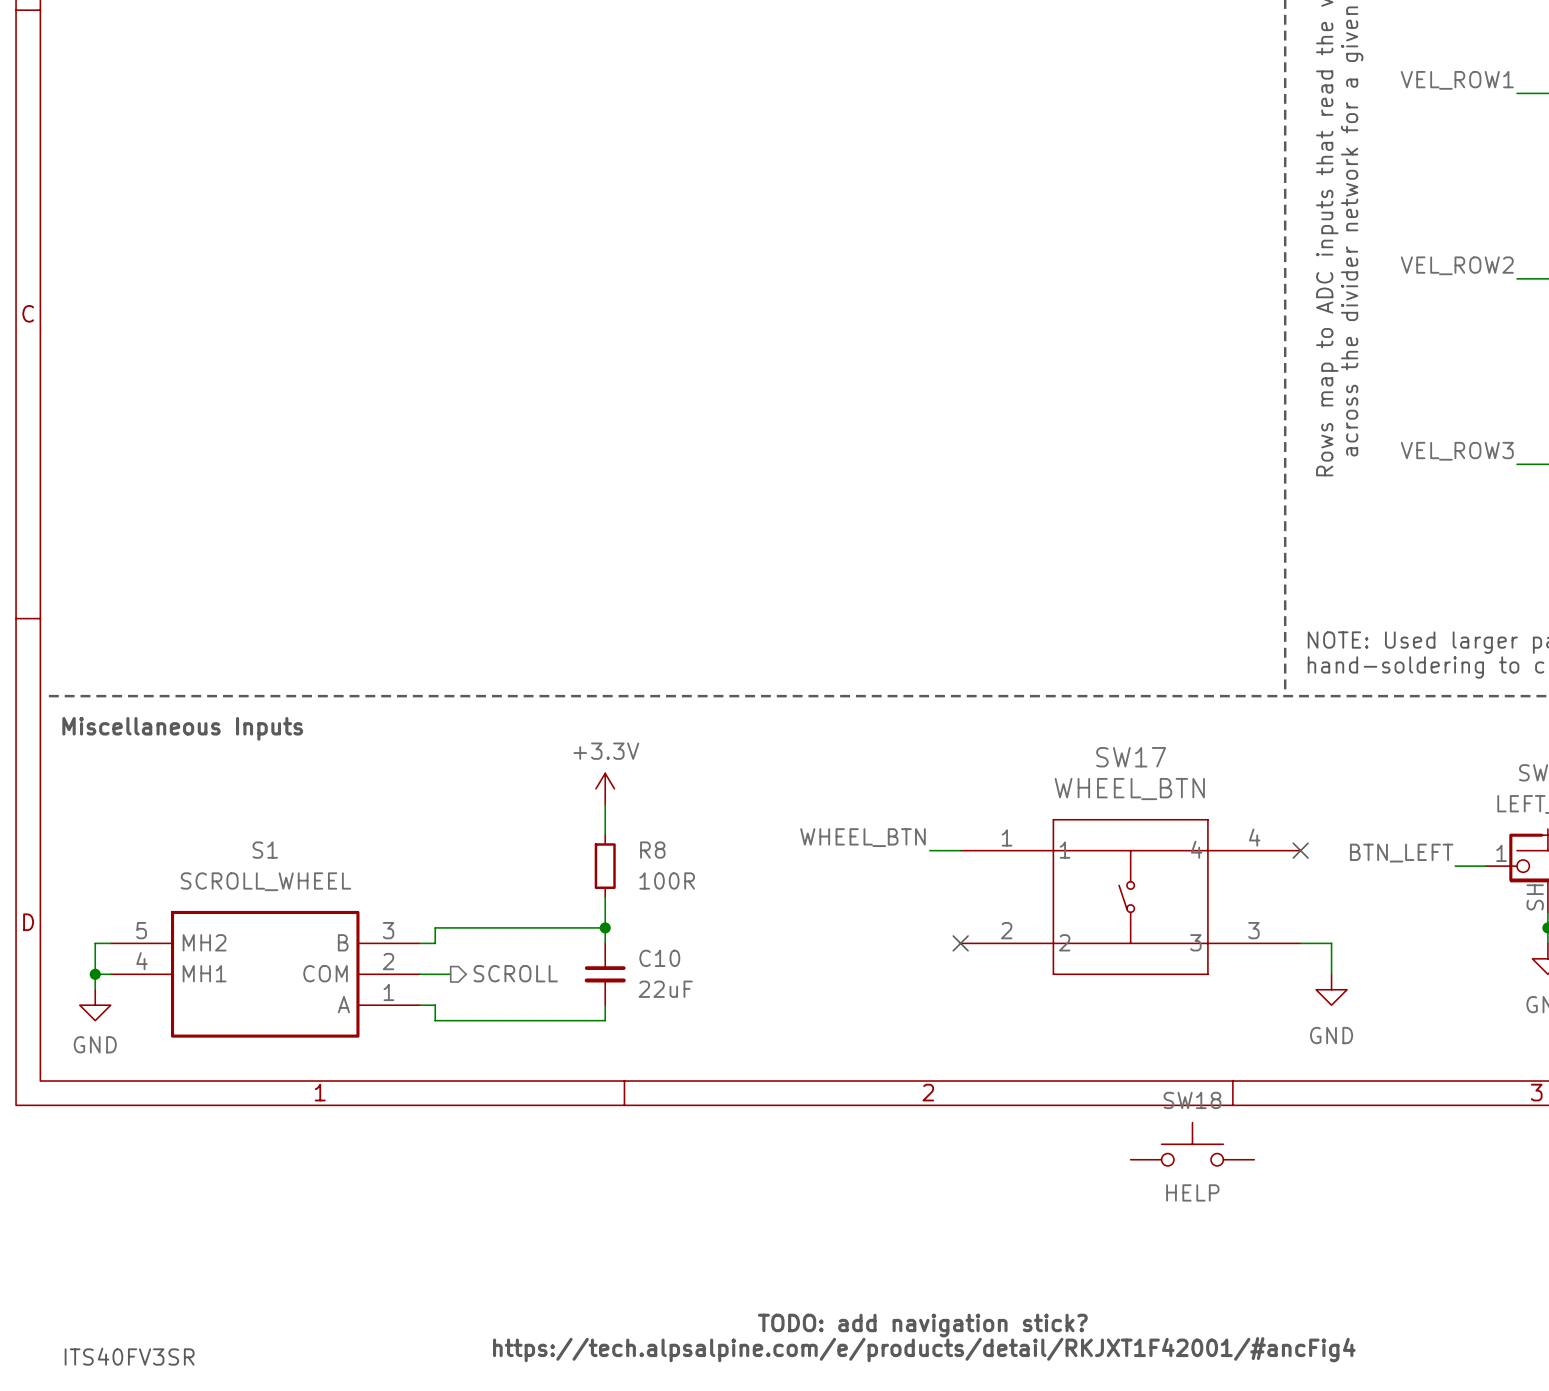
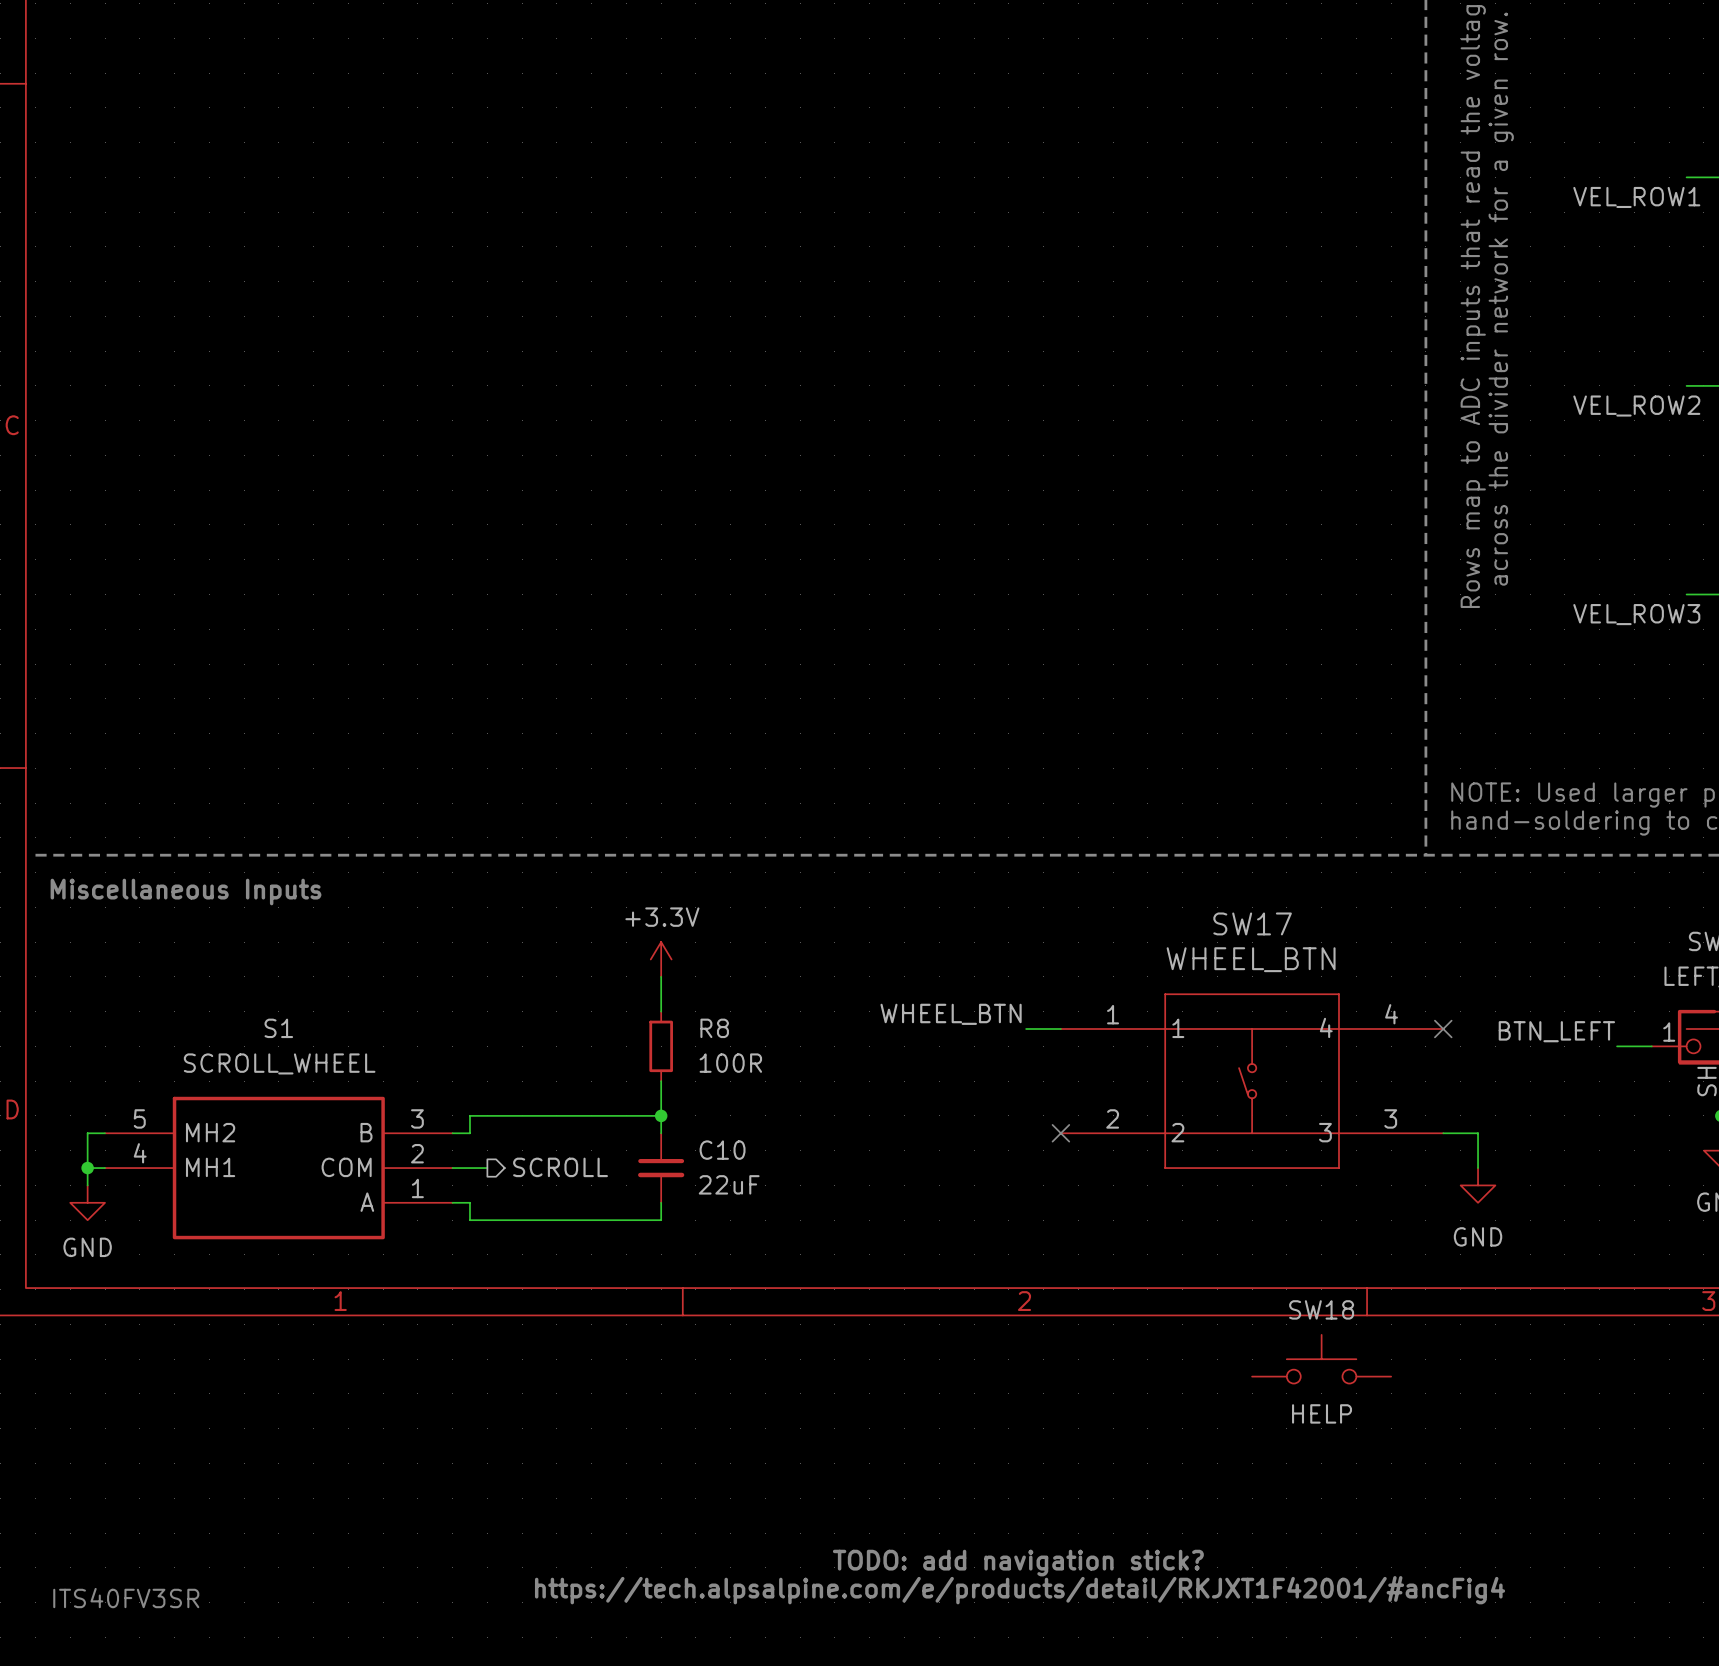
label position: VEL_ROW1 (1457, 80) -> VEL_ROW1 (1636, 197)
label position: VEL_ROW2 (1457, 265) -> VEL_ROW2 (1636, 406)
label position: VEL_ROW3 (1457, 451) -> VEL_ROW3 (1636, 614)

